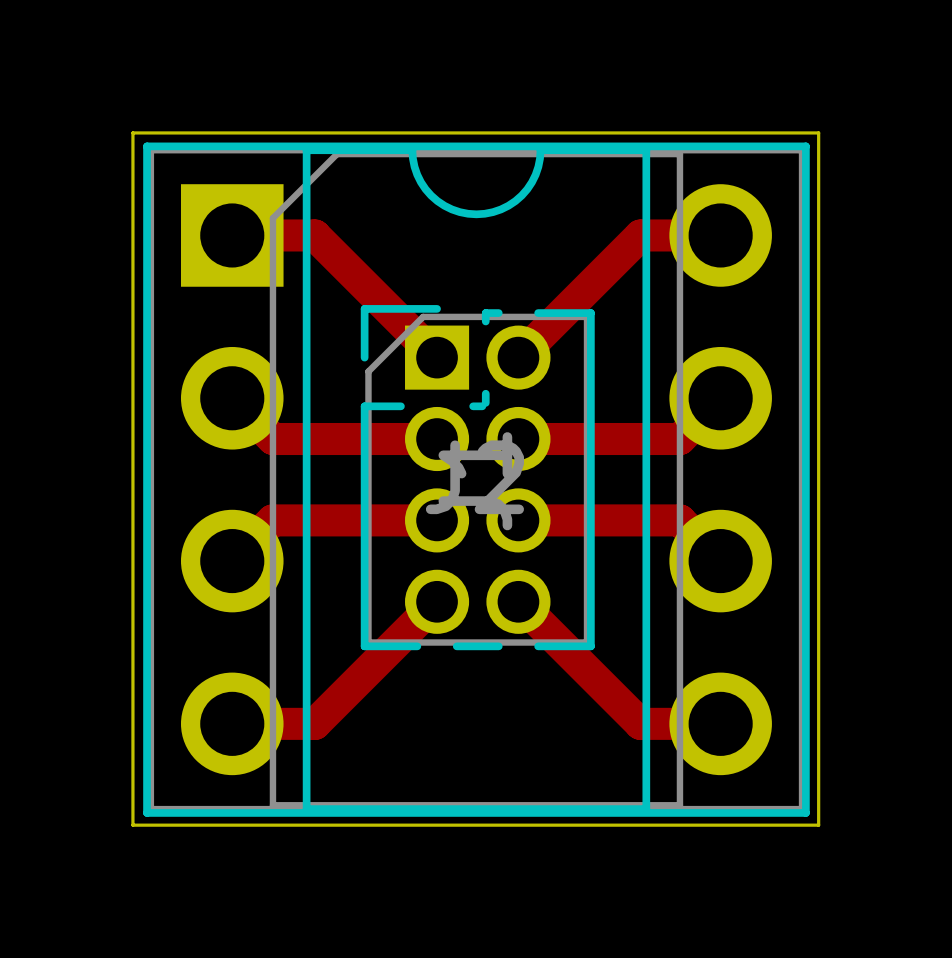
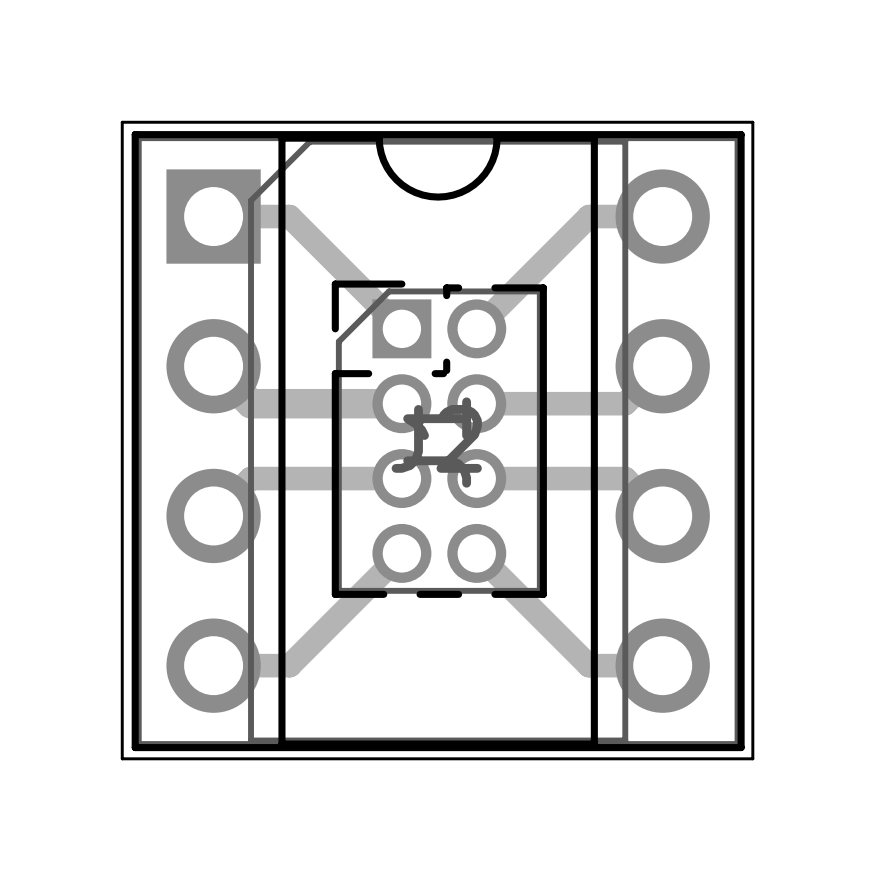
track width: thick (232, 235) (314, 235) (437, 357) -> thin (213, 216) (289, 216) (401, 328)
track width: thick (720, 235) (640, 235) (518, 357) -> thin (662, 216) (589, 216) (476, 328)
track width: thick (720, 398) (679, 439) (518, 439) -> thin (662, 366) (625, 403) (476, 403)
track width: thick (437, 520) (272, 520) (232, 560) -> thin (401, 478) (250, 478) (213, 515)
track width: thick (518, 520) (679, 520) (720, 561) -> thin (476, 478) (625, 478) (662, 515)
track width: thick (437, 601) (314, 723) (232, 723) -> thin (401, 553) (289, 665) (213, 665)
track width: thick (518, 601) (640, 723) (720, 723) -> thin (476, 553) (589, 665) (662, 665)

